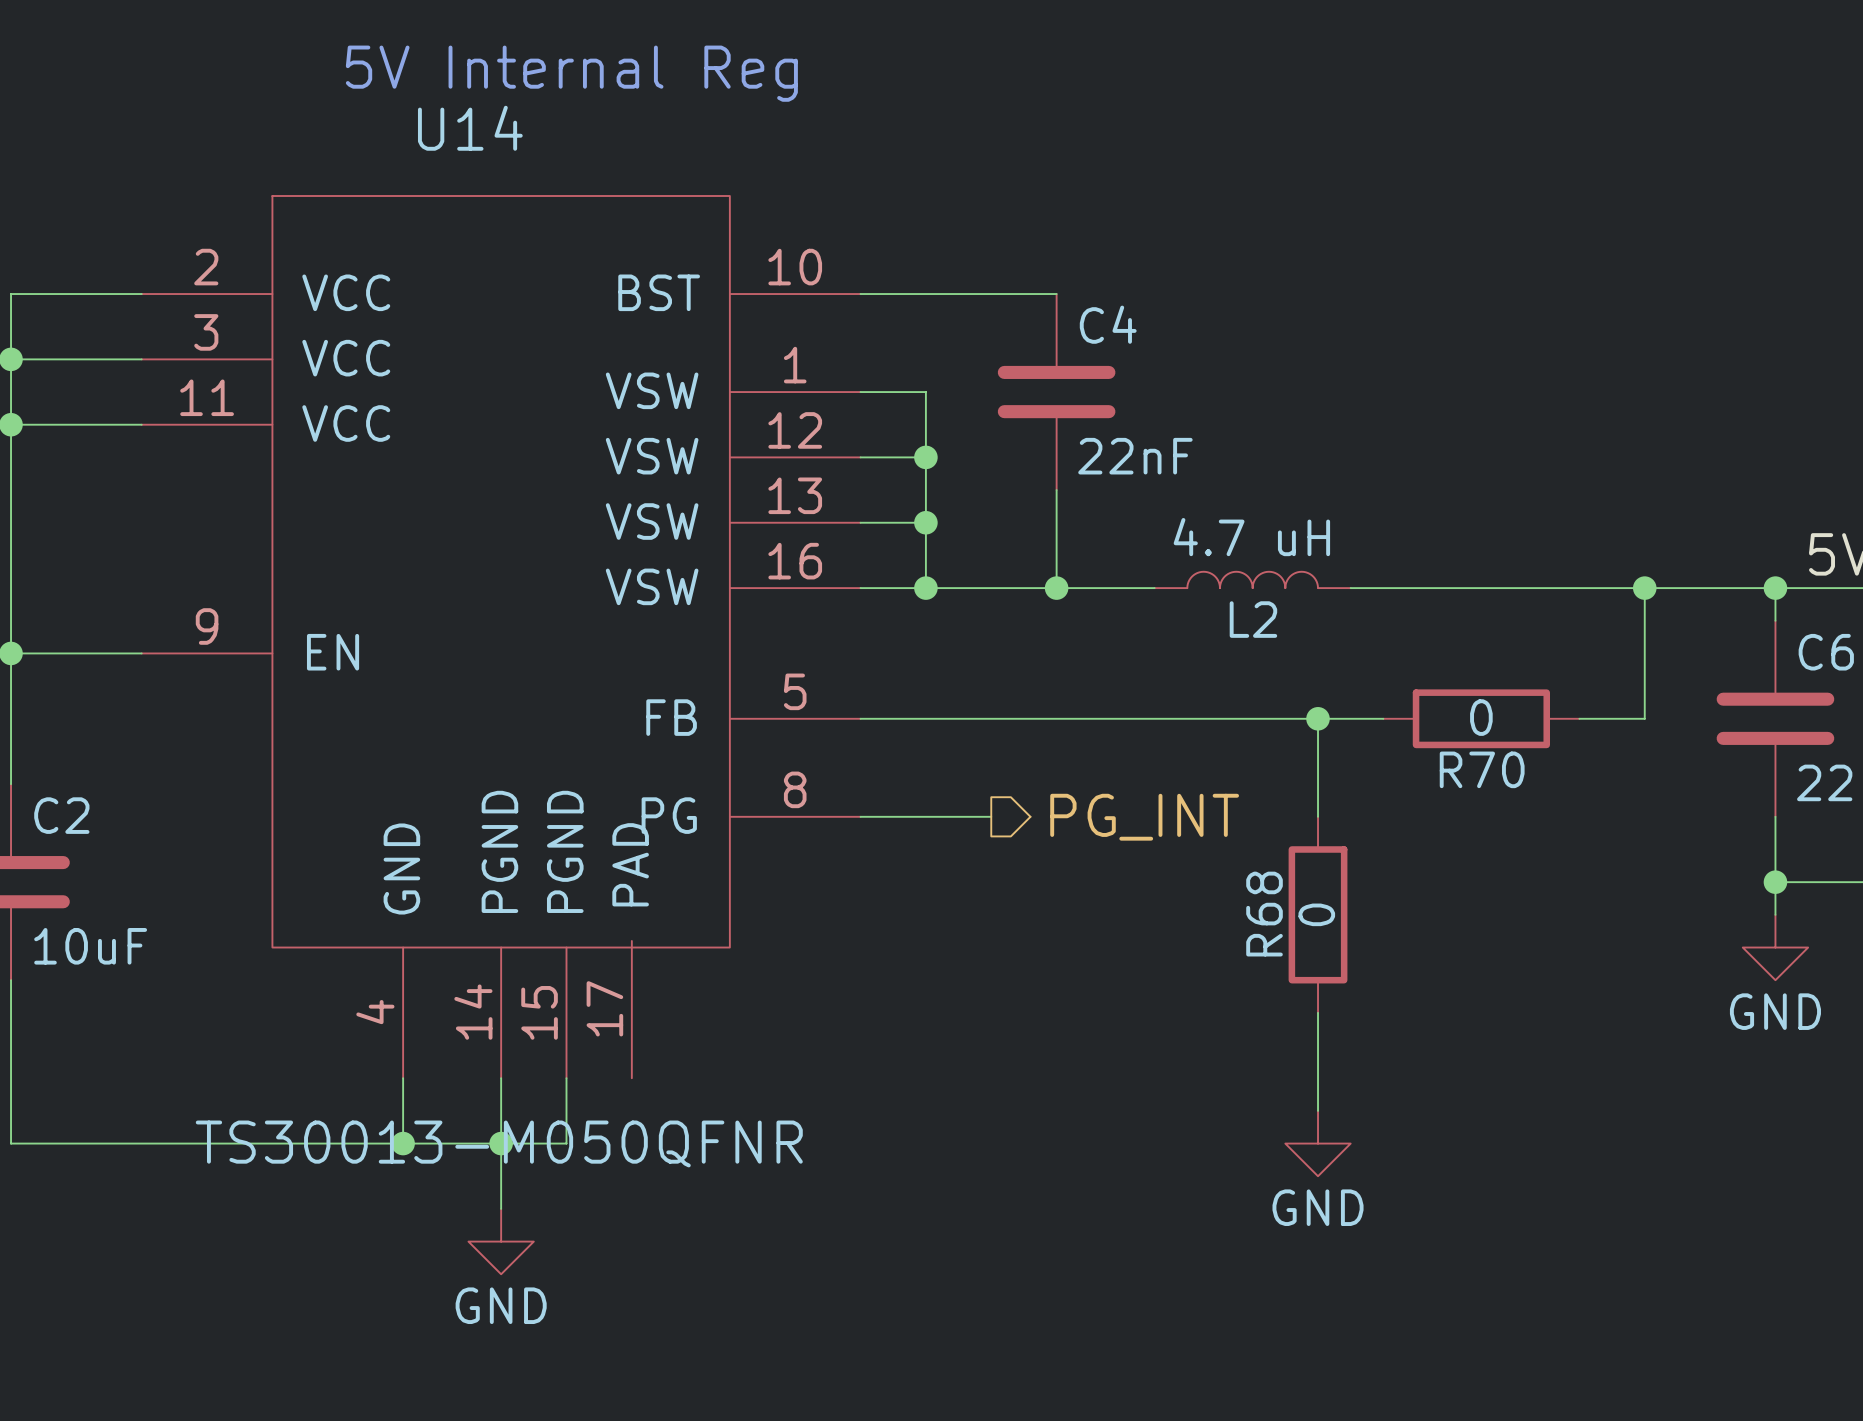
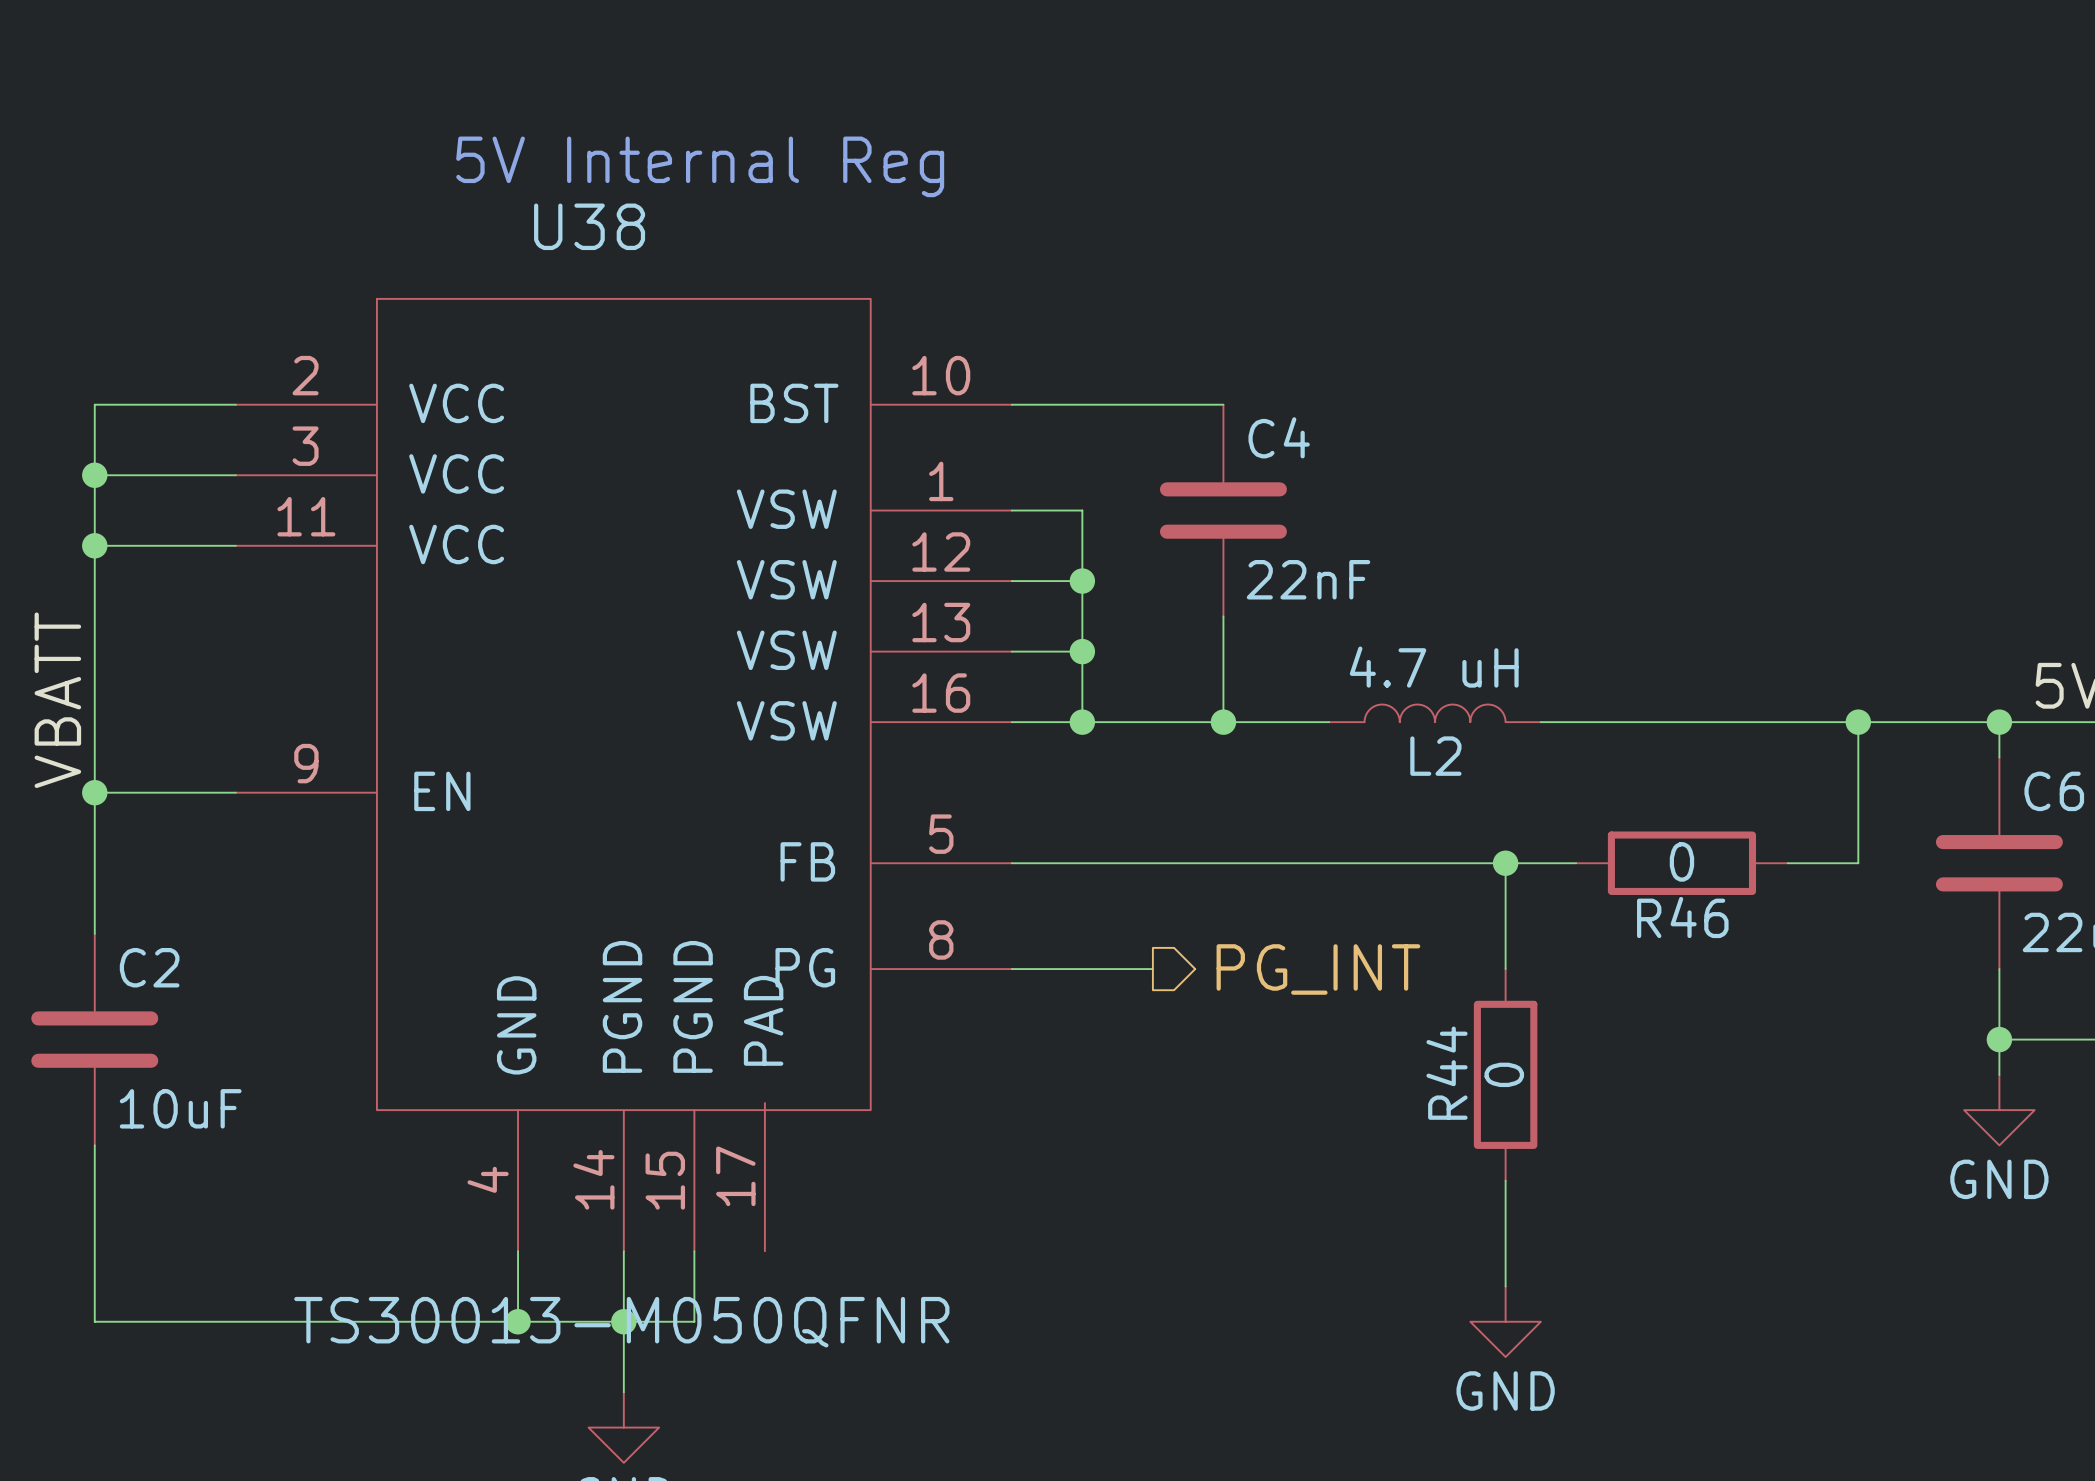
U14 name: U14 (470, 128) -> U38 (589, 226)
R70 name: R70 (1482, 769) -> R46 (1682, 917)
R68 name: R68 (1264, 914) -> R44 (1447, 1073)

